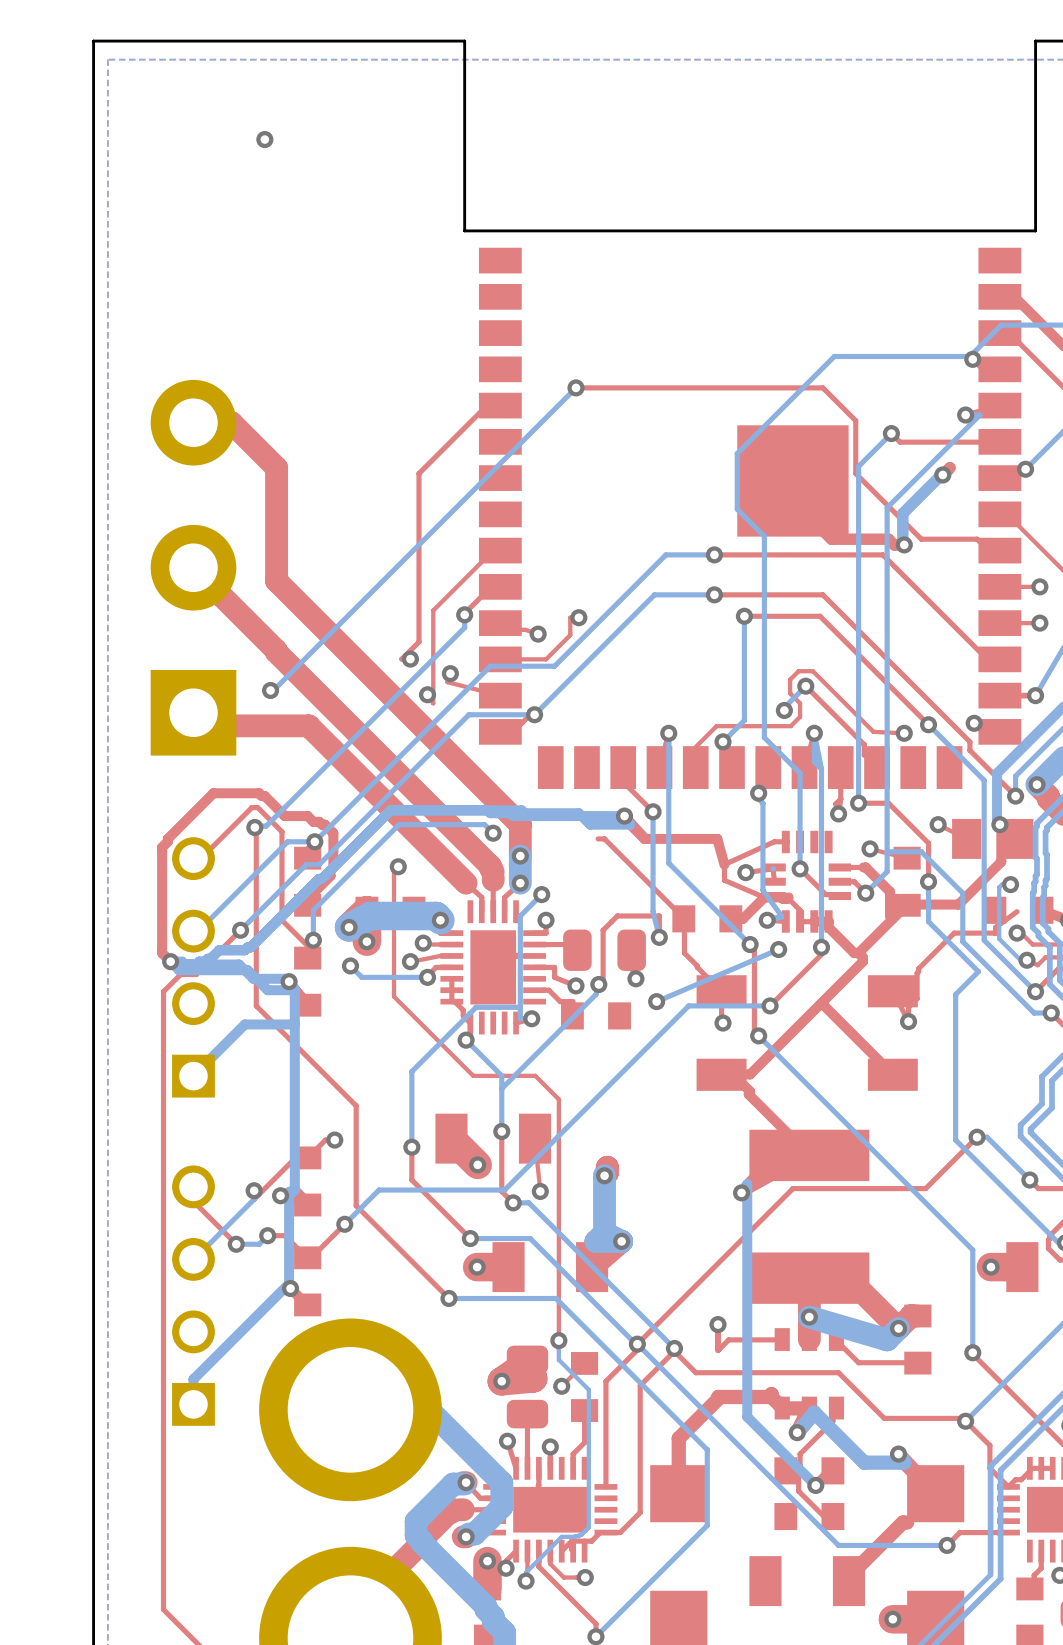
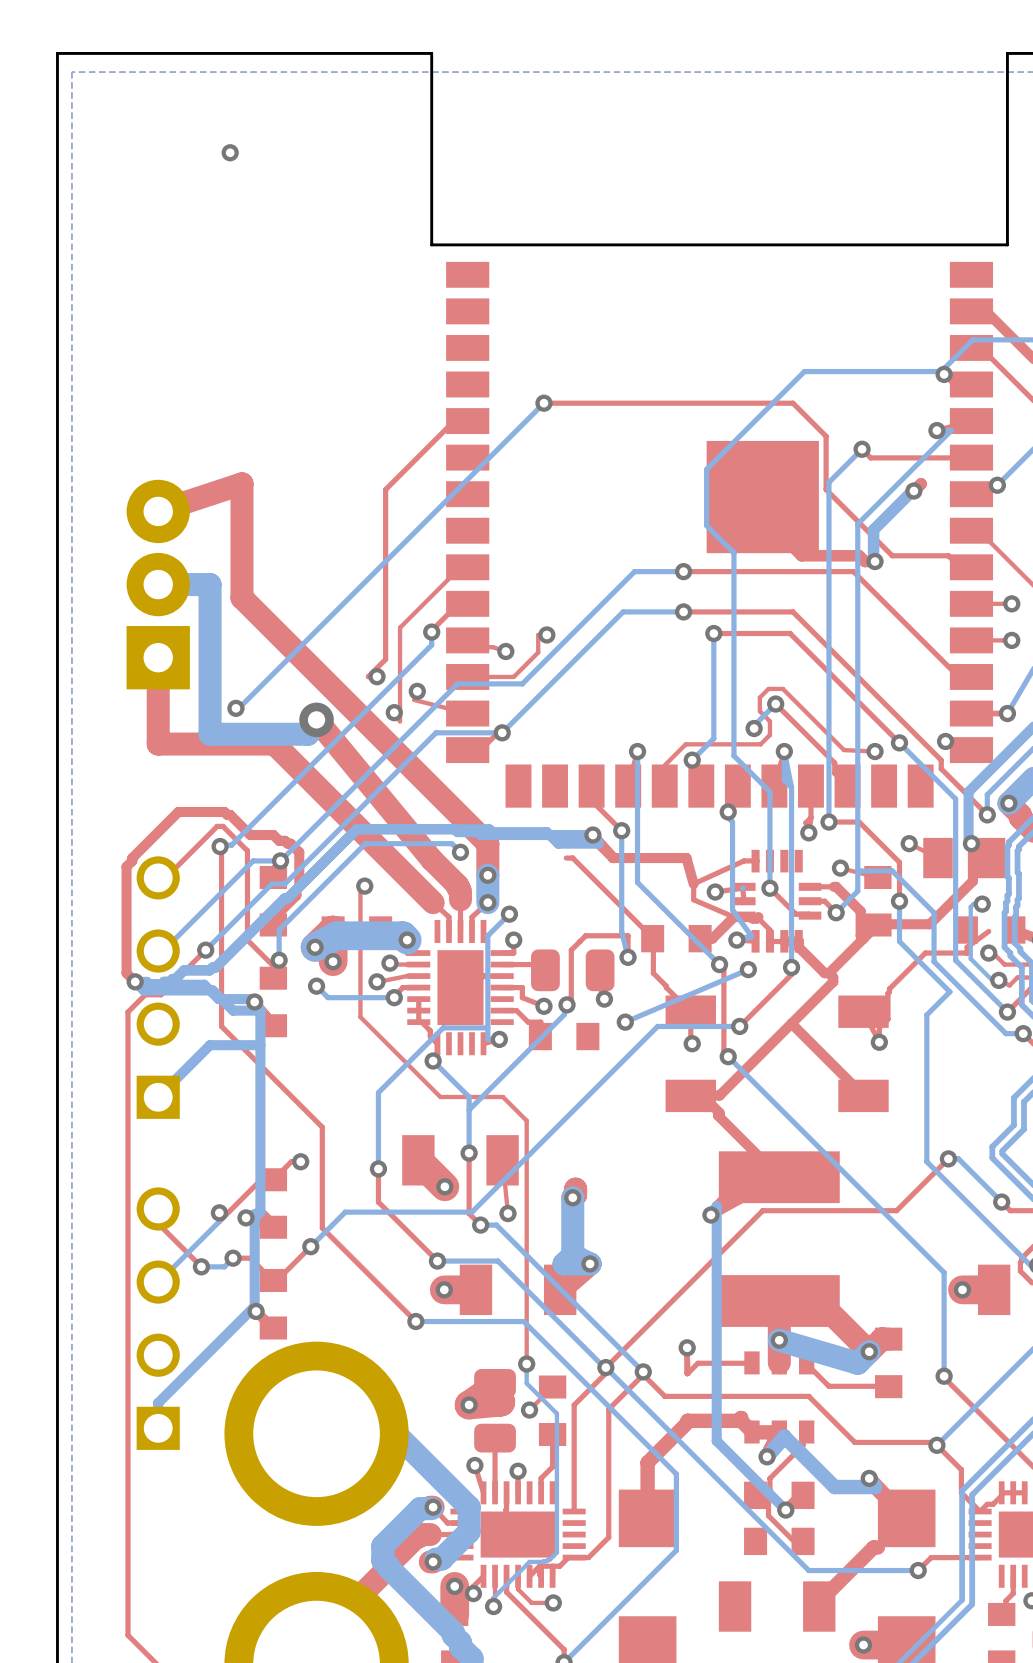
part footprint: [150, 379, 237, 756] -> [126, 479, 190, 690]
top track: (193, 422) (231, 422) (276, 467) -> (158, 511) (241, 483)
top track: (193, 567) (464, 840) -> (316, 719) (431, 859)
bottom track: none -> (158, 584) (210, 584) (210, 734) (307, 734) (316, 719)
top track: none -> (158, 657) (158, 744)
via: none -> (316, 719)

